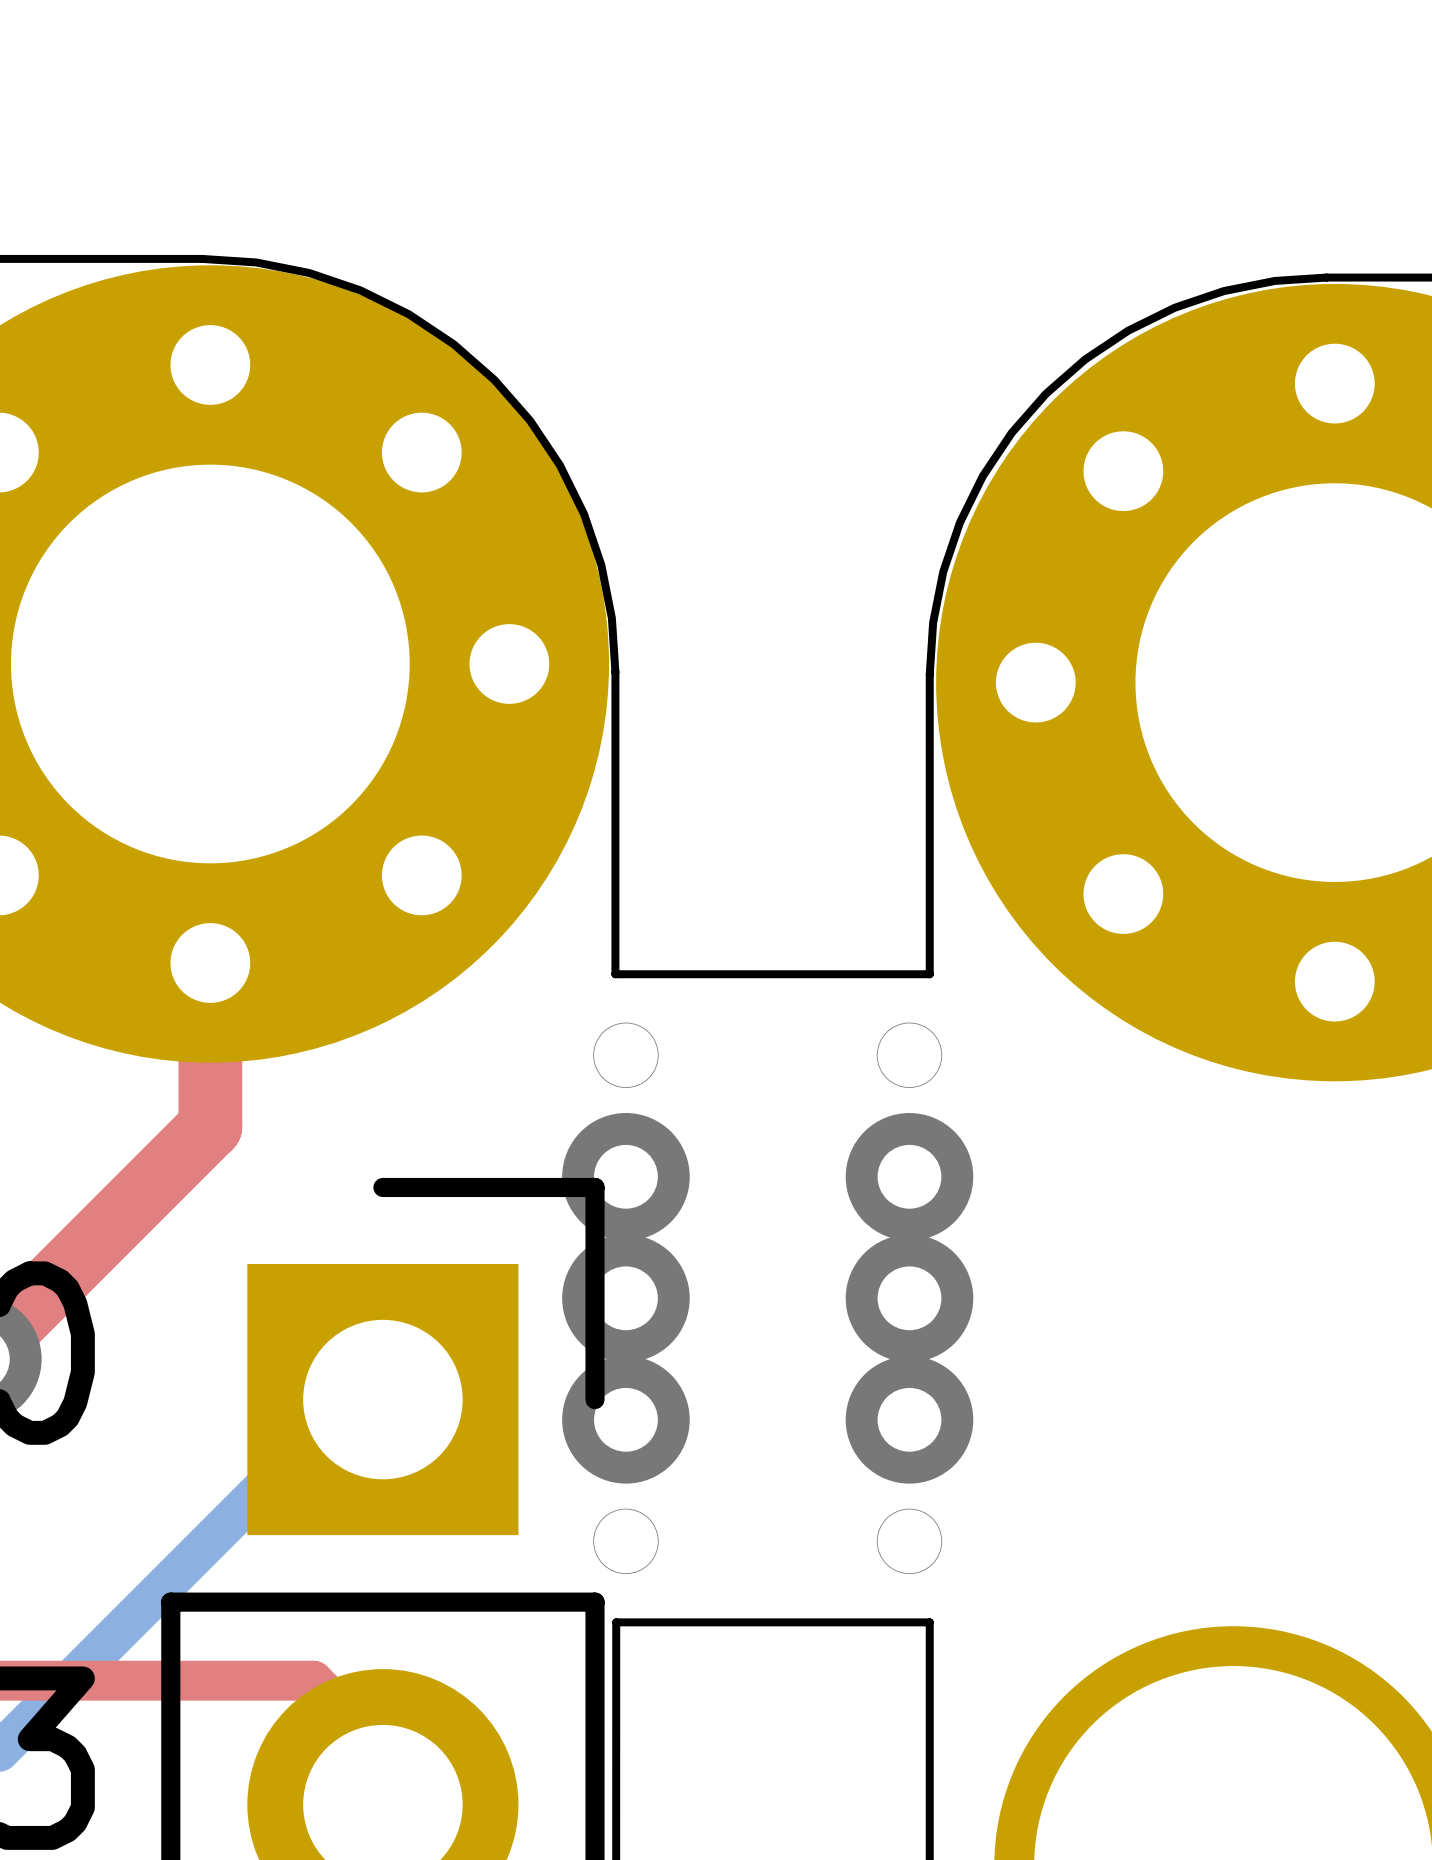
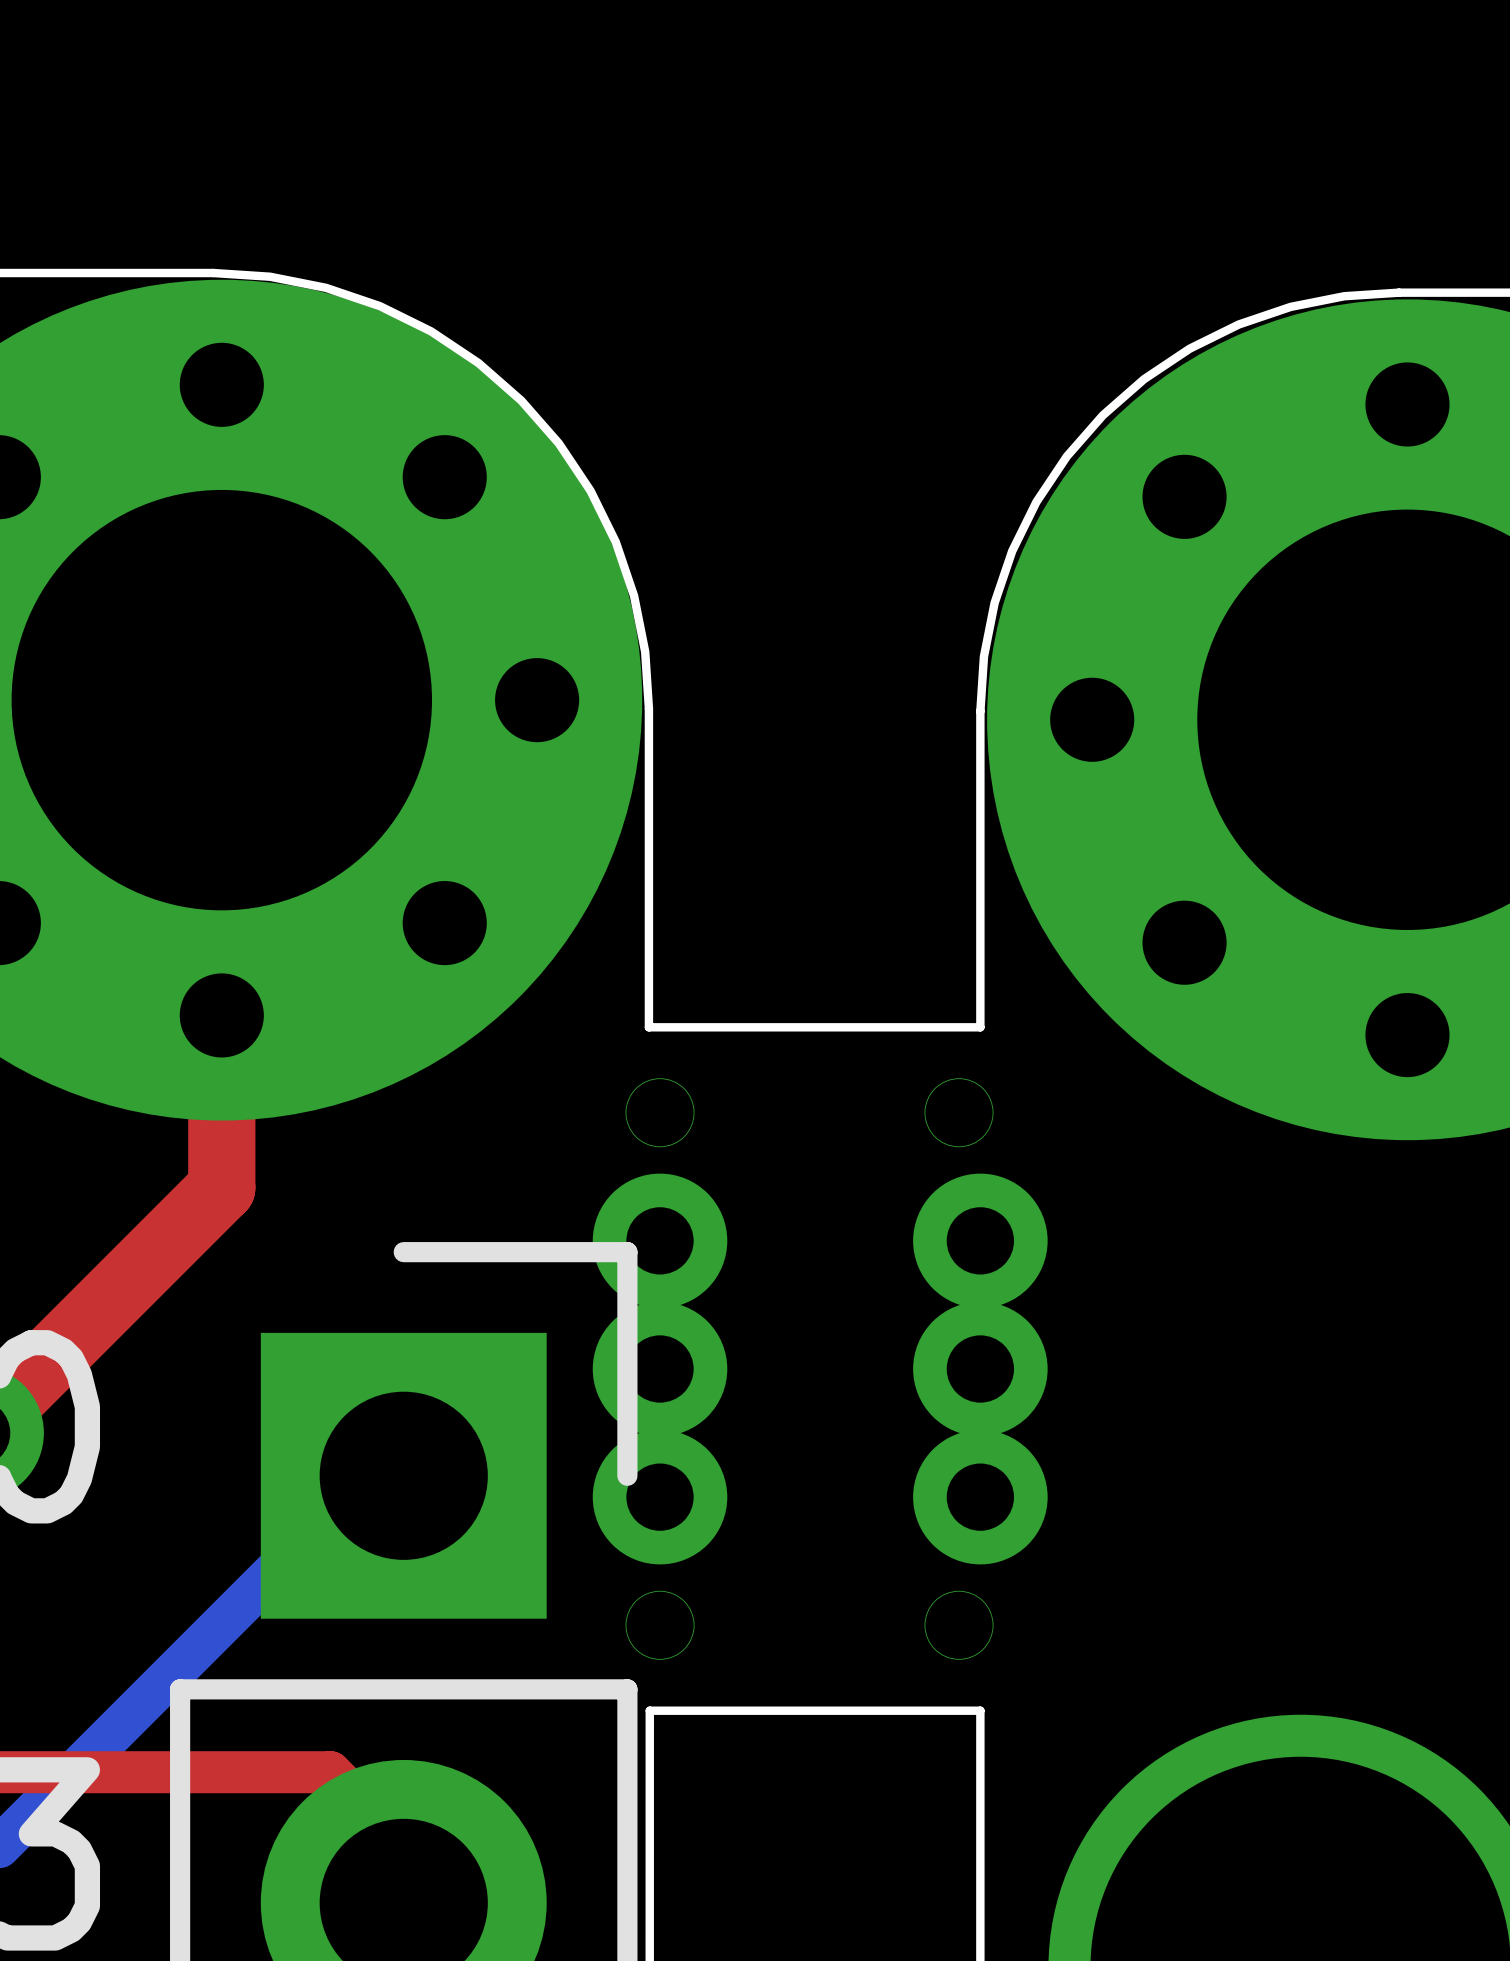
via position: (909, 1176) -> (980, 1240)
via position: (909, 1298) -> (980, 1369)
via position: (909, 1419) -> (980, 1497)

